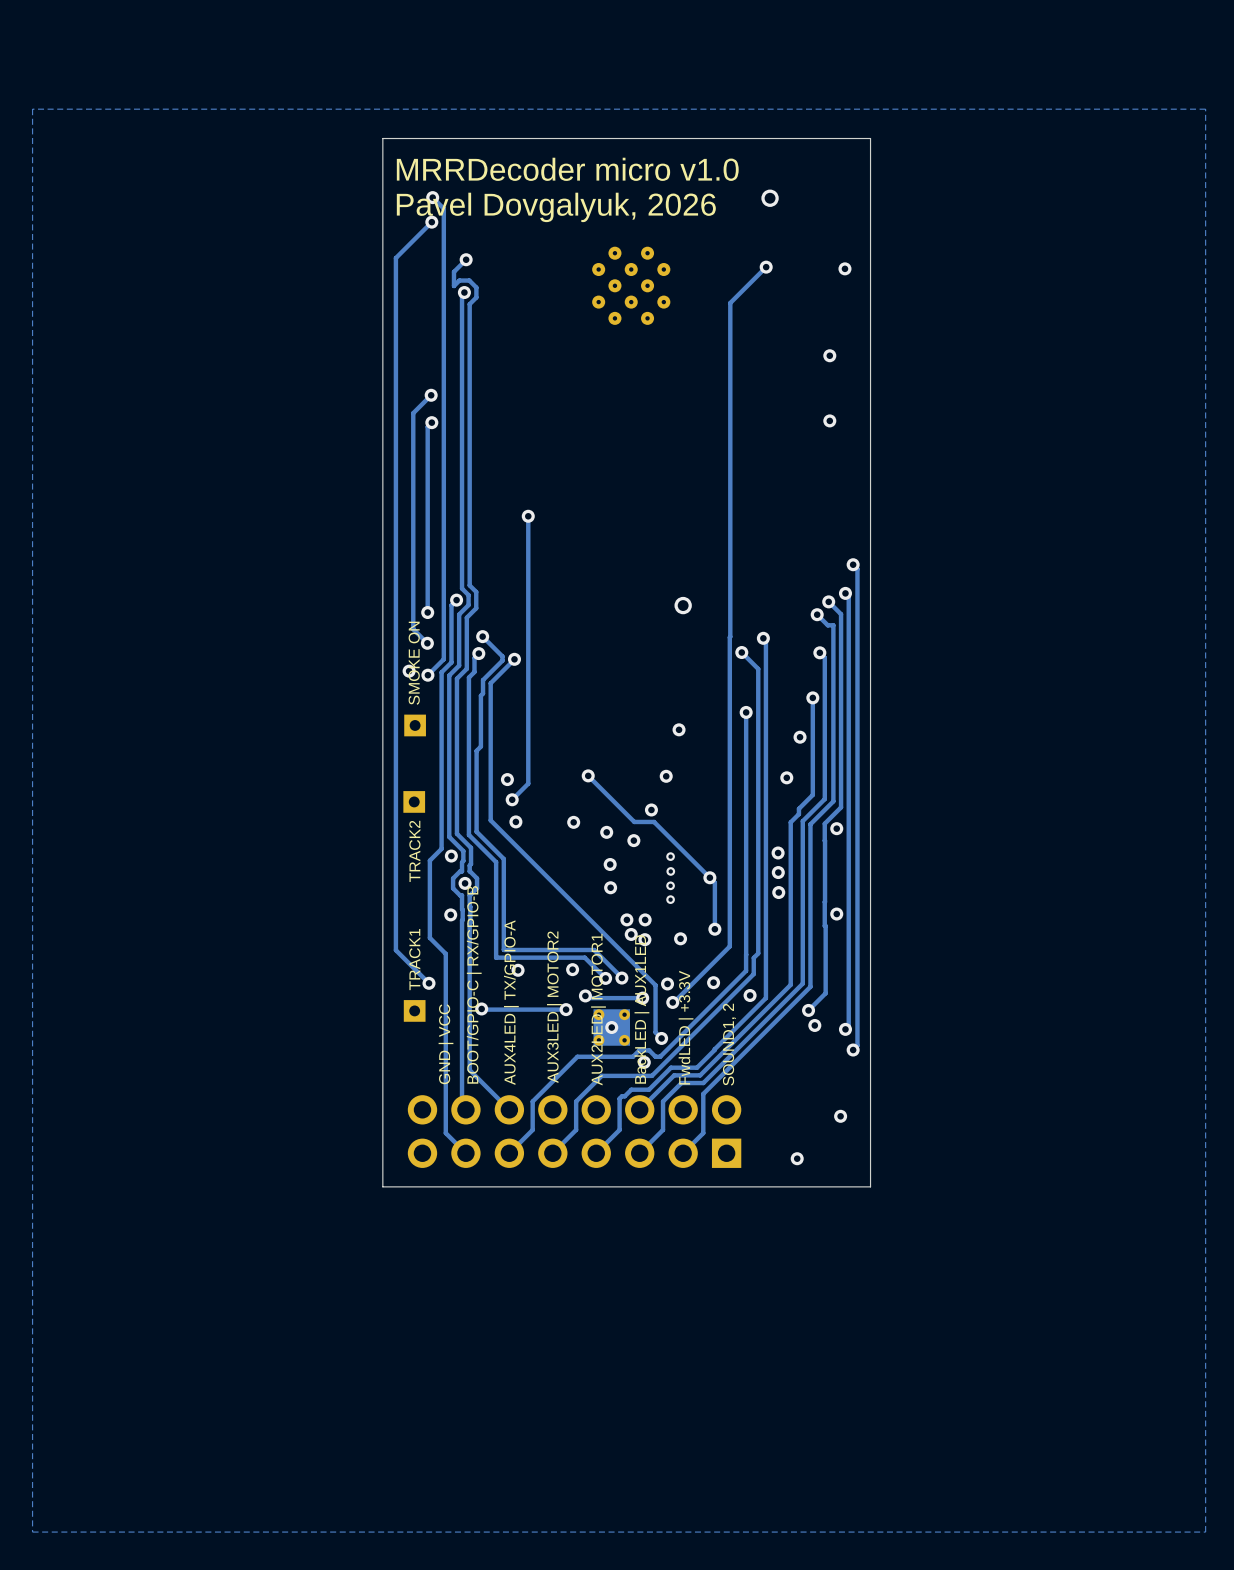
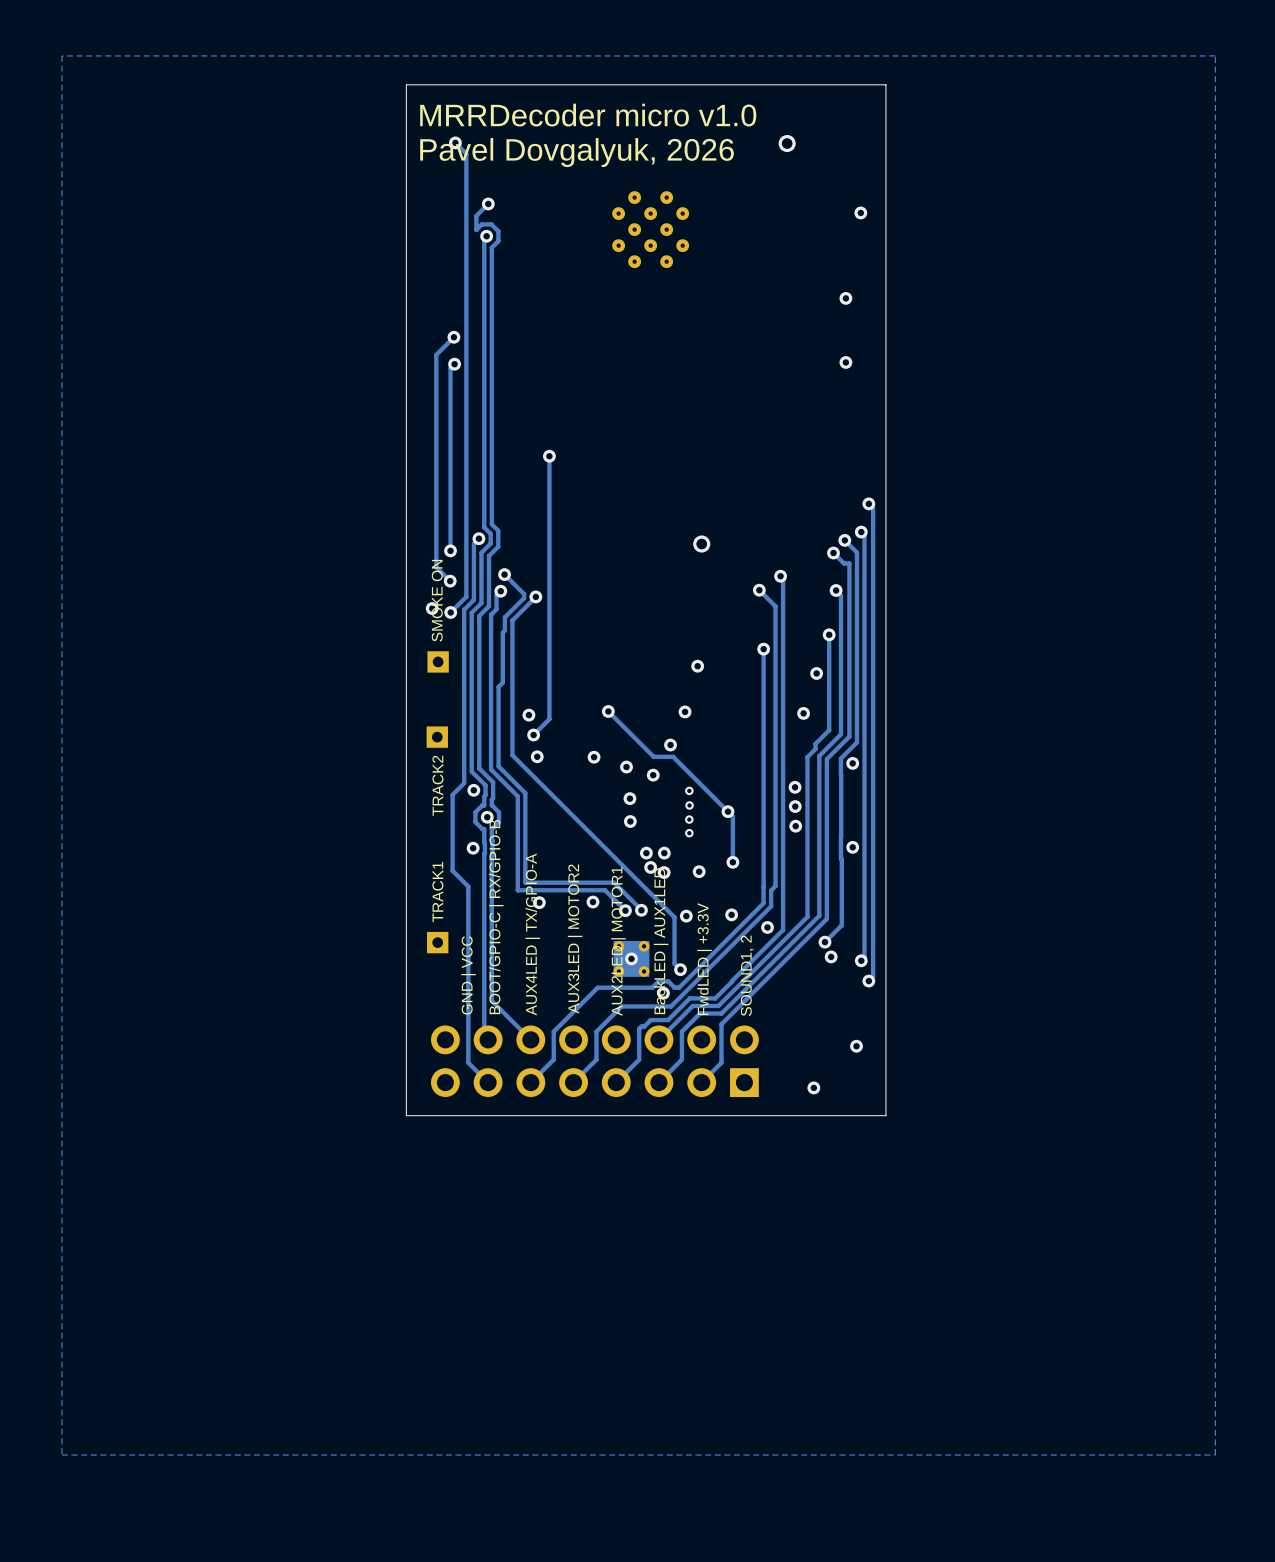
track: (431, 222) (395, 258) (395, 950) (429, 983) -> none
via: (431, 222) -> none
track: (766, 267) (730, 303) (729, 946) (672, 1002) -> none
via: (766, 267) -> none
via: (429, 983) -> none
track: (585, 995) (587, 998) (642, 998) -> none
via: (585, 995) -> none
via: (642, 998) -> none
via: (672, 1002) -> none
track: (481, 1008) (566, 1009) -> none
via: (481, 1008) -> none
via: (566, 1009) -> none

